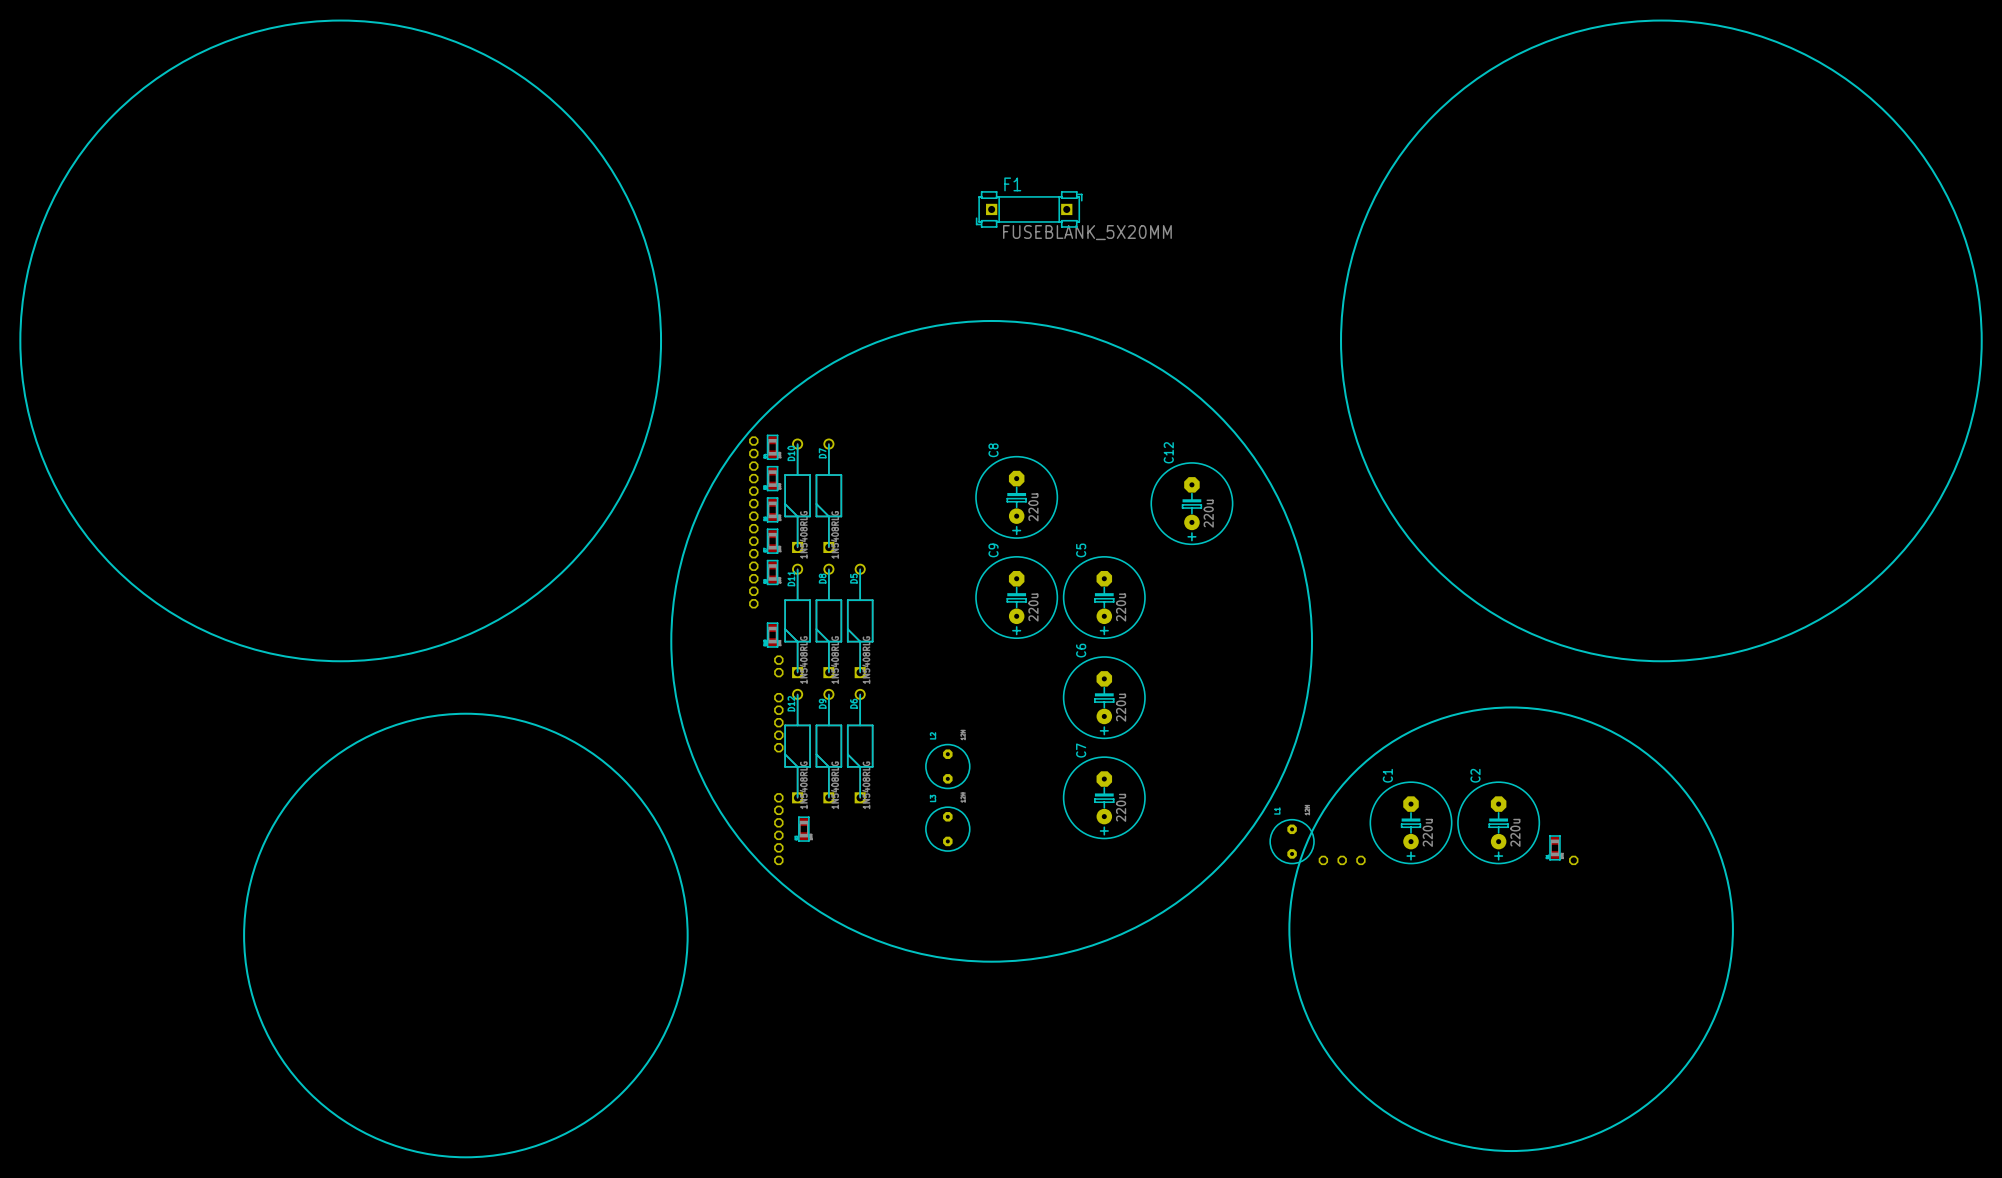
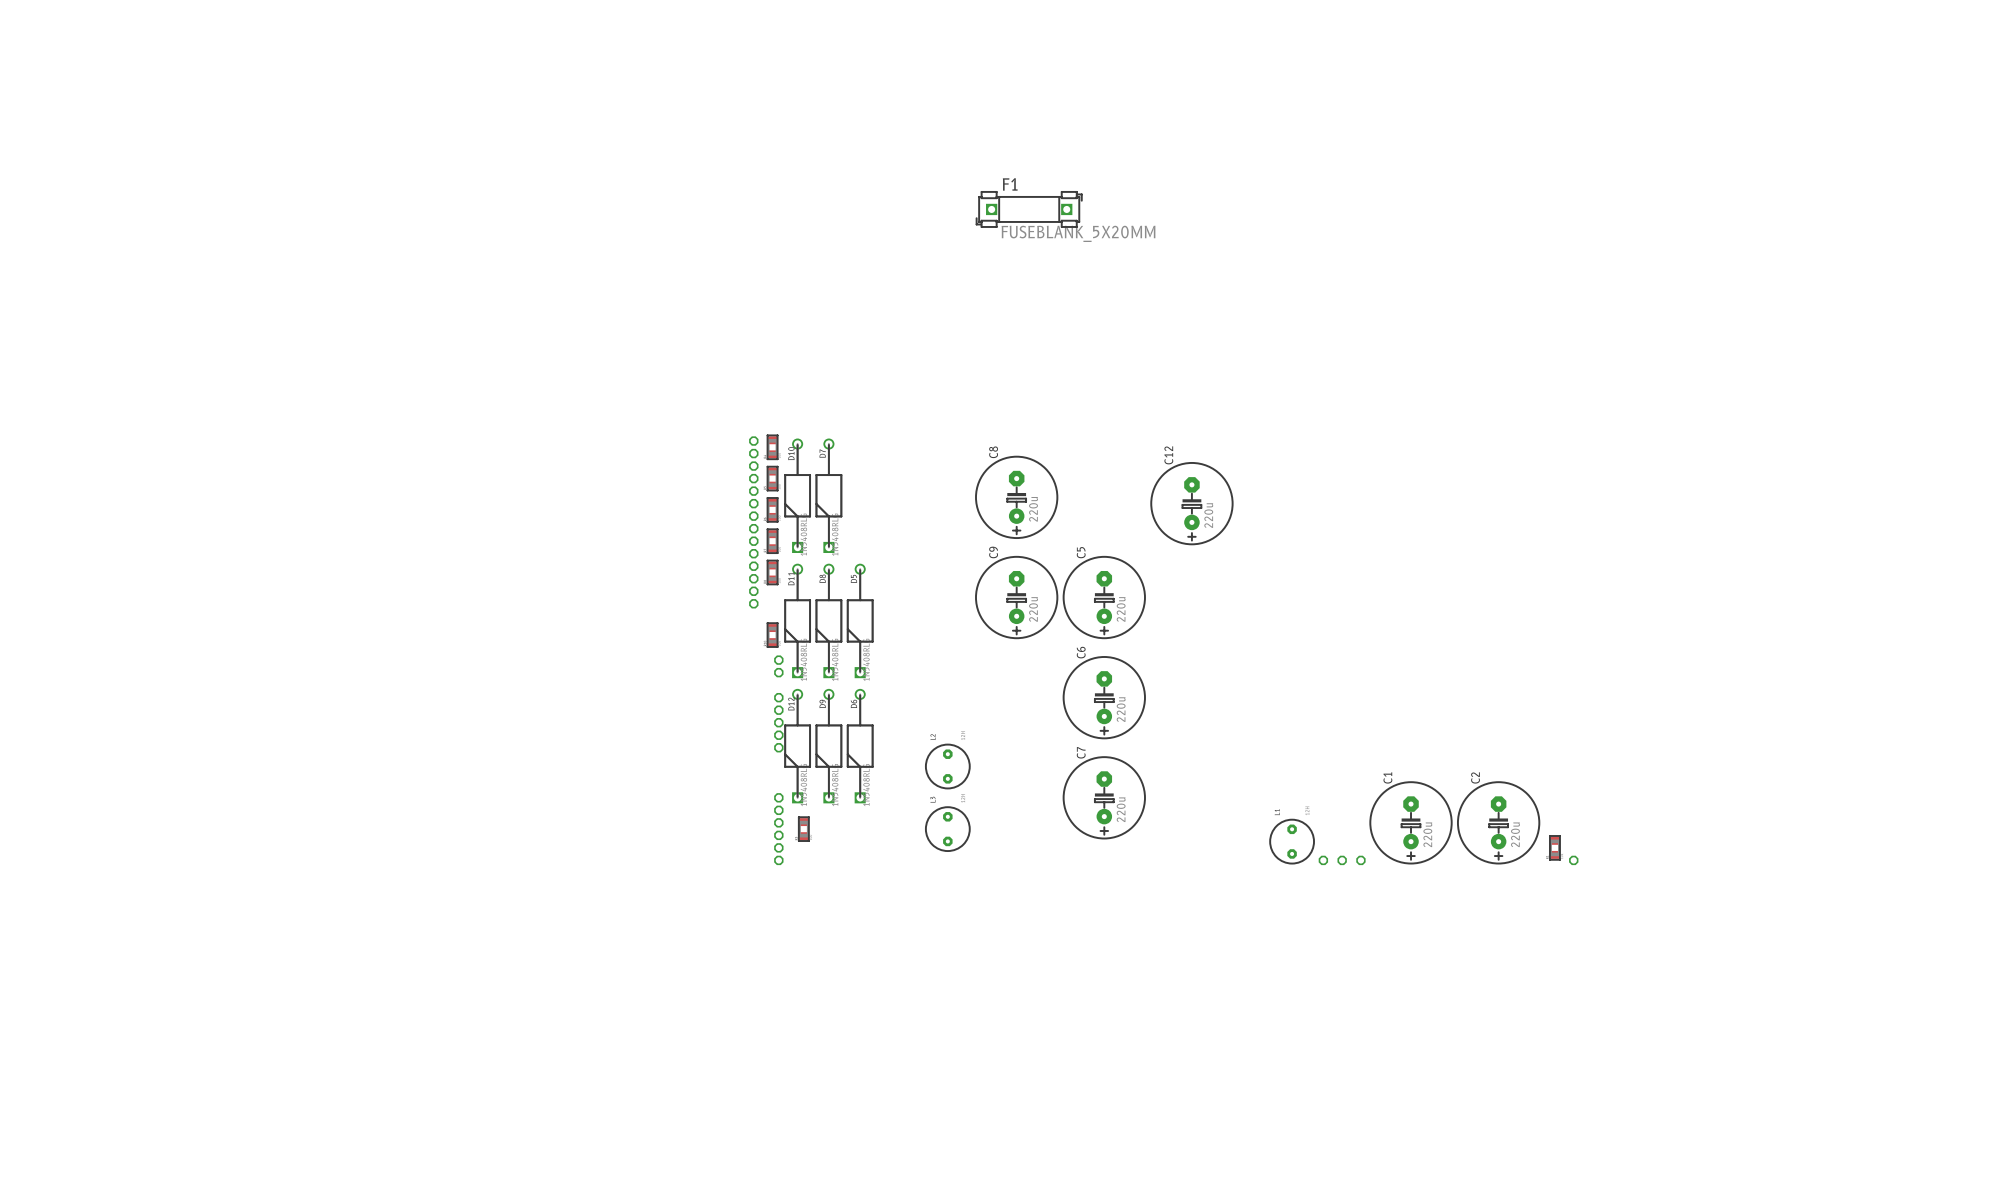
drawing: [19, 19, 663, 663] -> none
drawing: [1340, 19, 1983, 663] -> none
drawing: [243, 319, 1734, 1159] -> none

